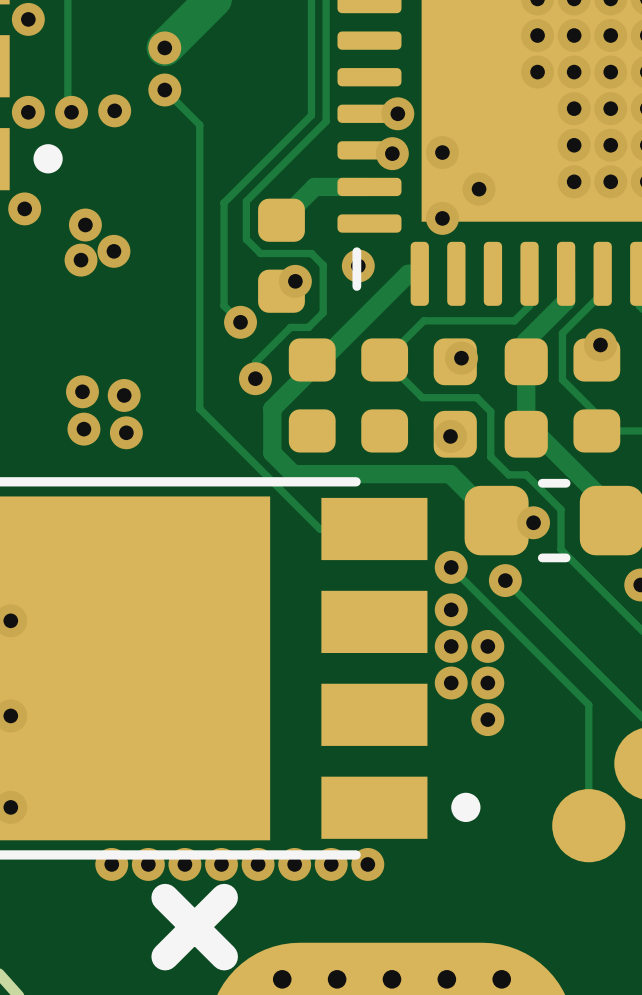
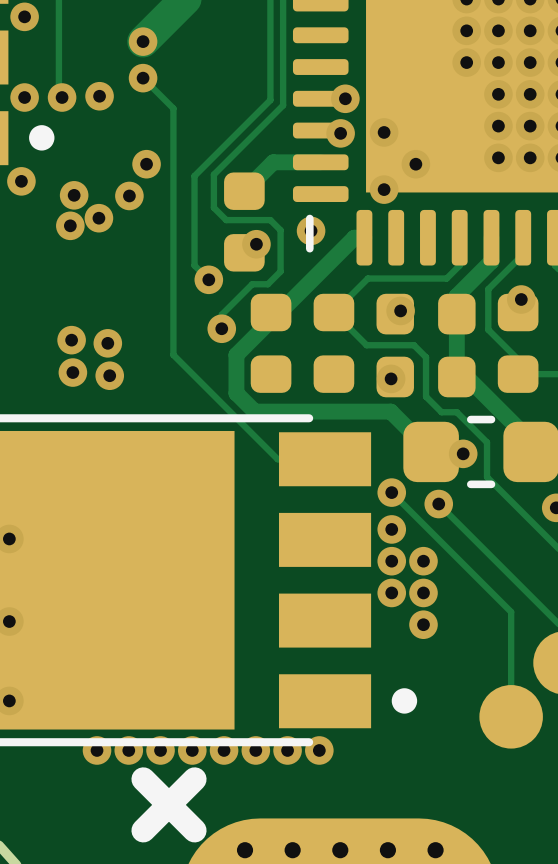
via: none -> (146, 164)
via: none -> (129, 195)

